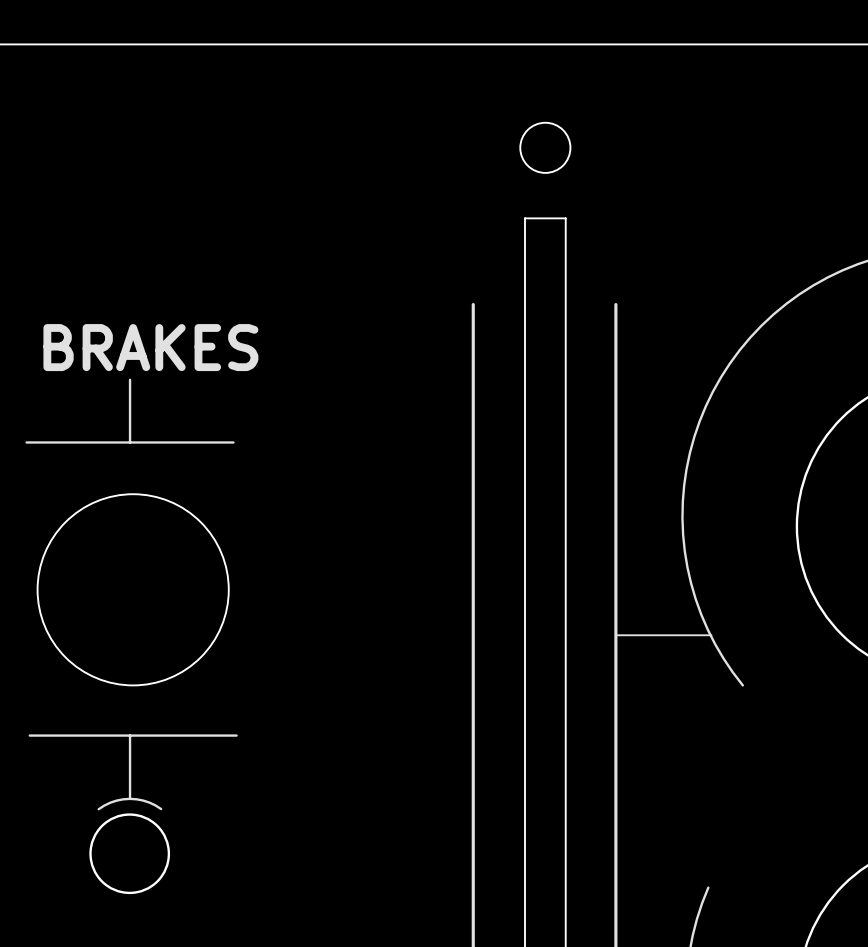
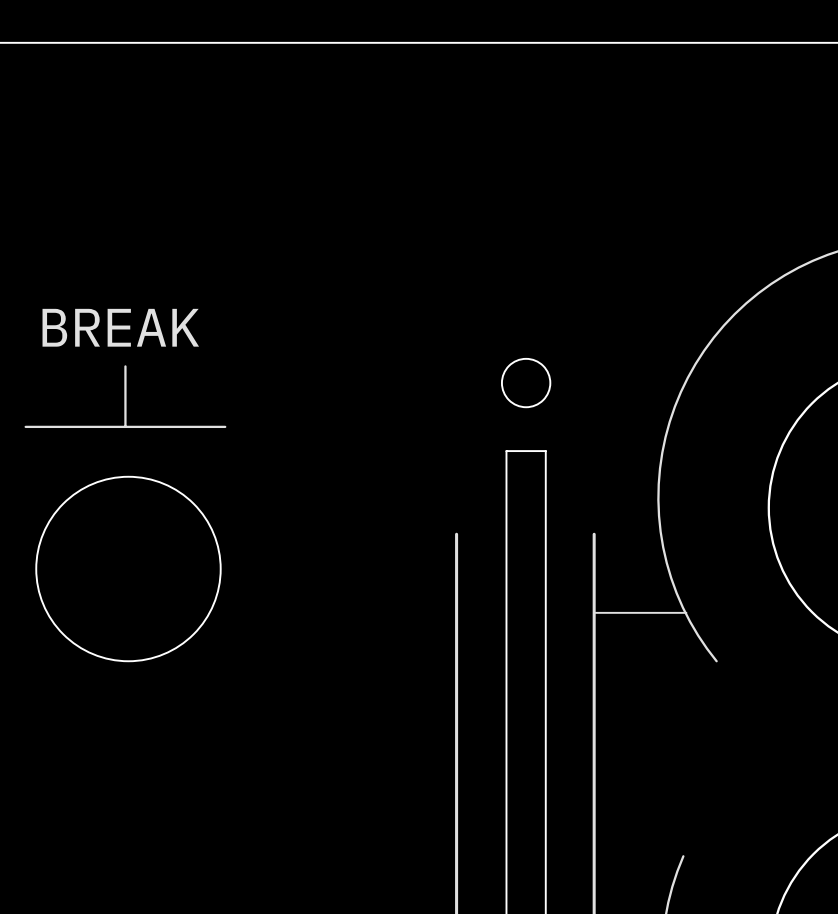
round board edge position: (545, 147) -> (526, 383)
line: (473, 304) (473, 553) -> none
line: (615, 304) (615, 553) -> none
text: BRAKES (150, 347) -> BREAK (120, 327)
board edge: (524, 467) (524, 218) (565, 218) (565, 467) -> (506, 451) (545, 451)
line: (29, 735) (236, 735) -> none
line: (130, 735) (130, 798) -> none
line: (161, 809) (149, 802) (129, 798) (116, 800) (98, 809) -> none
round board edge: [89, 813, 171, 895] -> none

